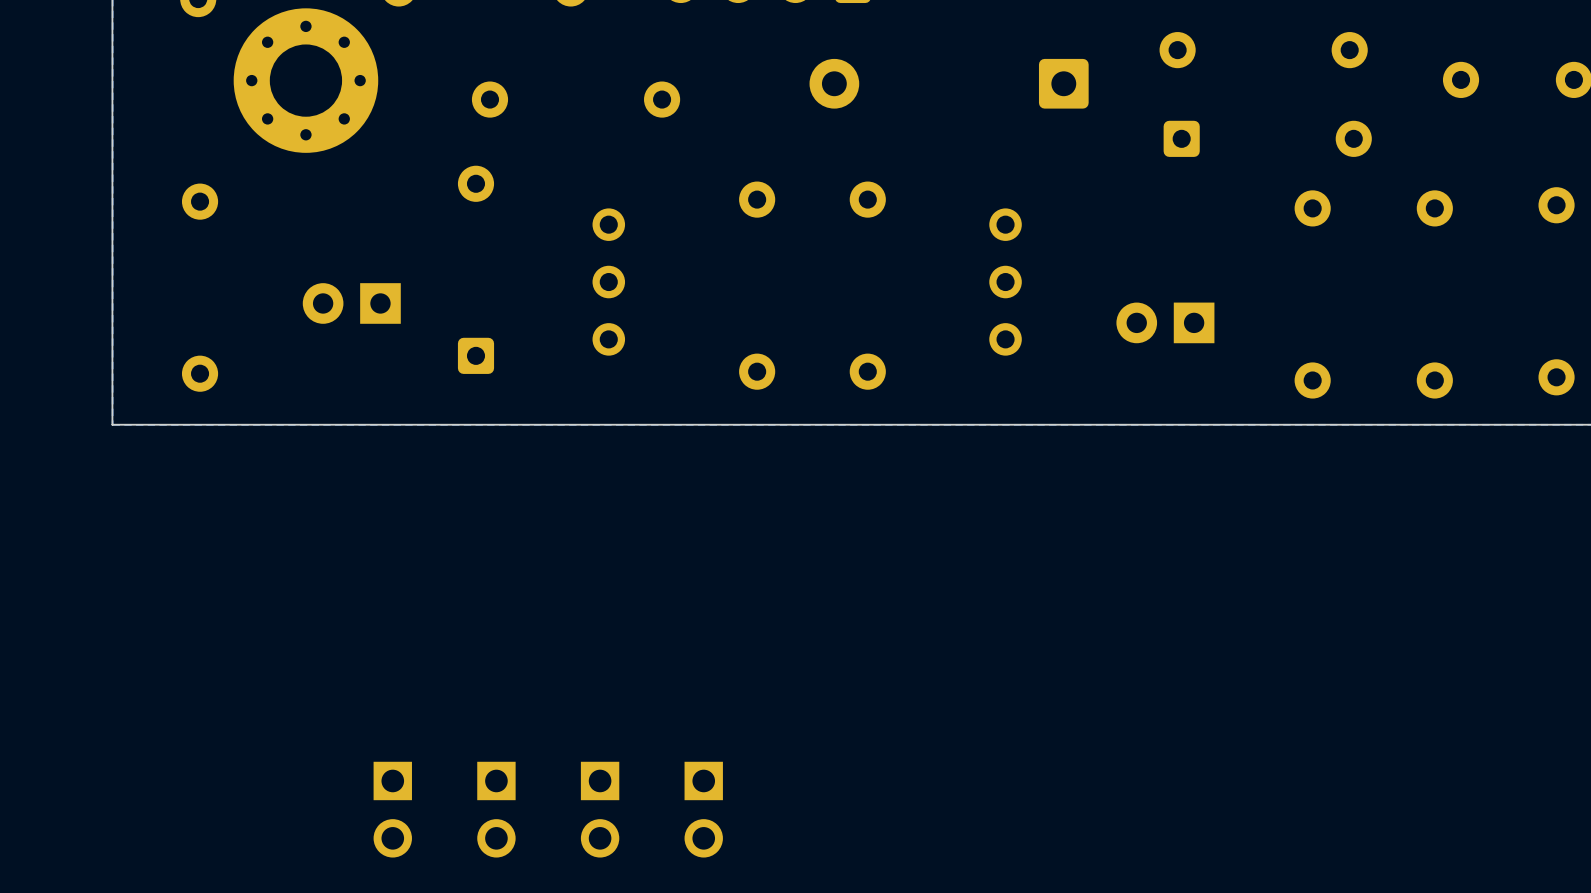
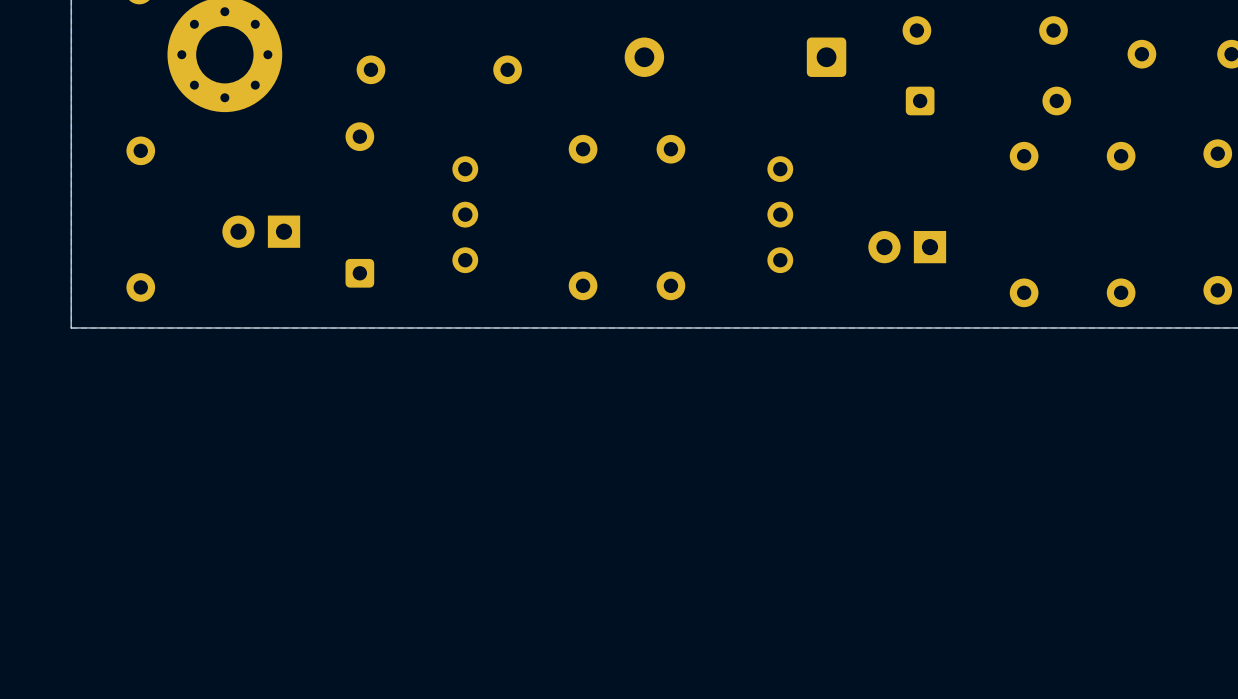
part: (392, 809) -> none
part: (496, 809) -> none
part: (600, 809) -> none
part: (703, 809) -> none

